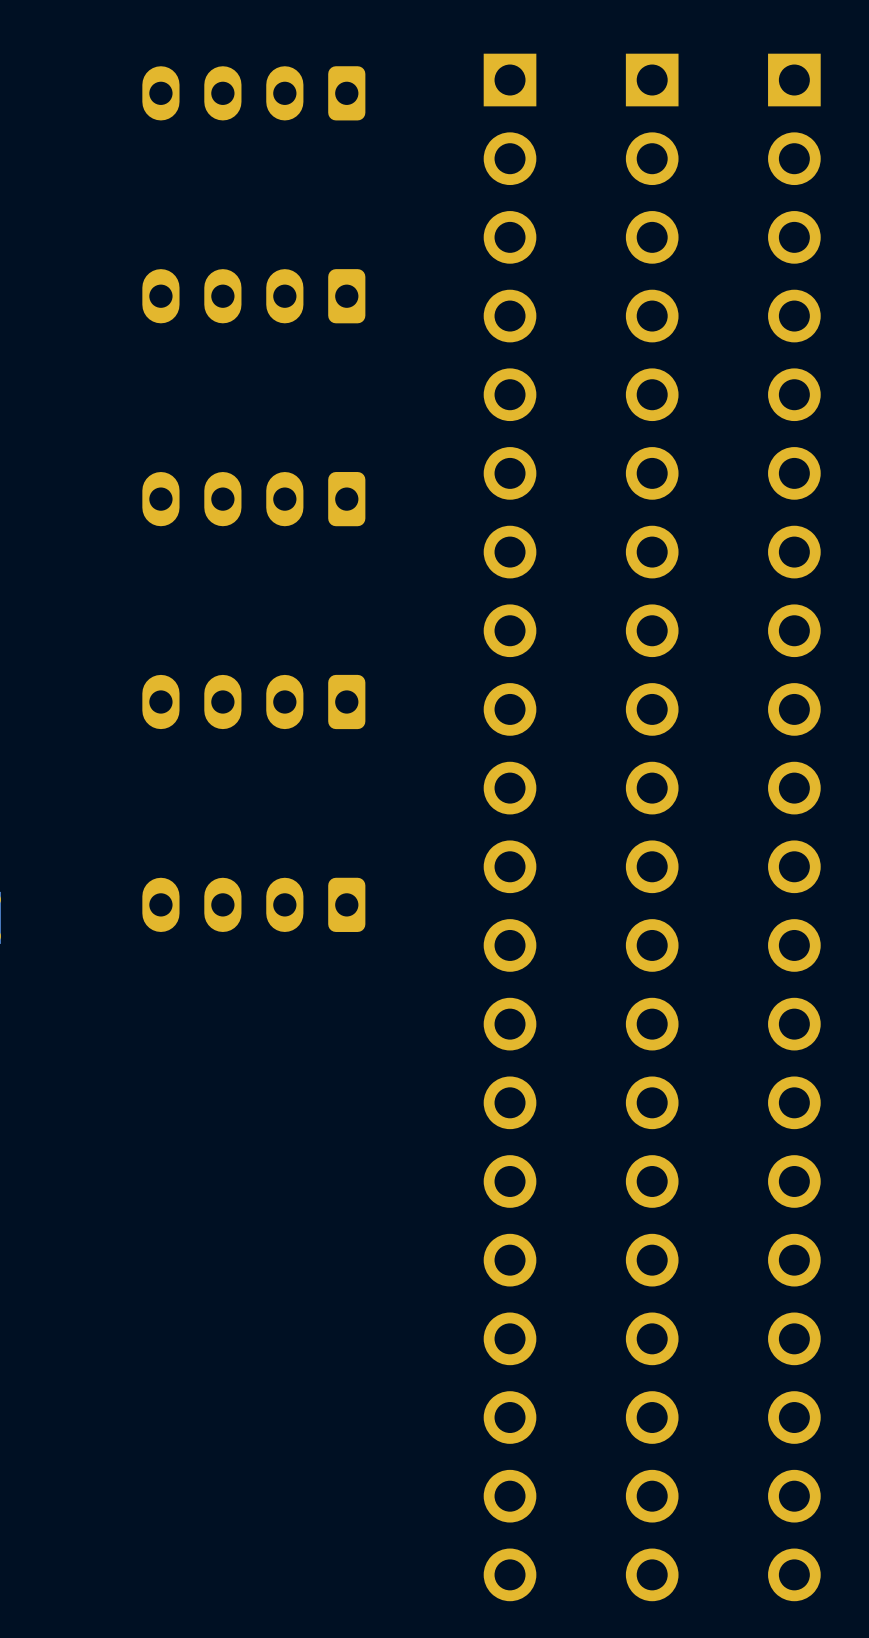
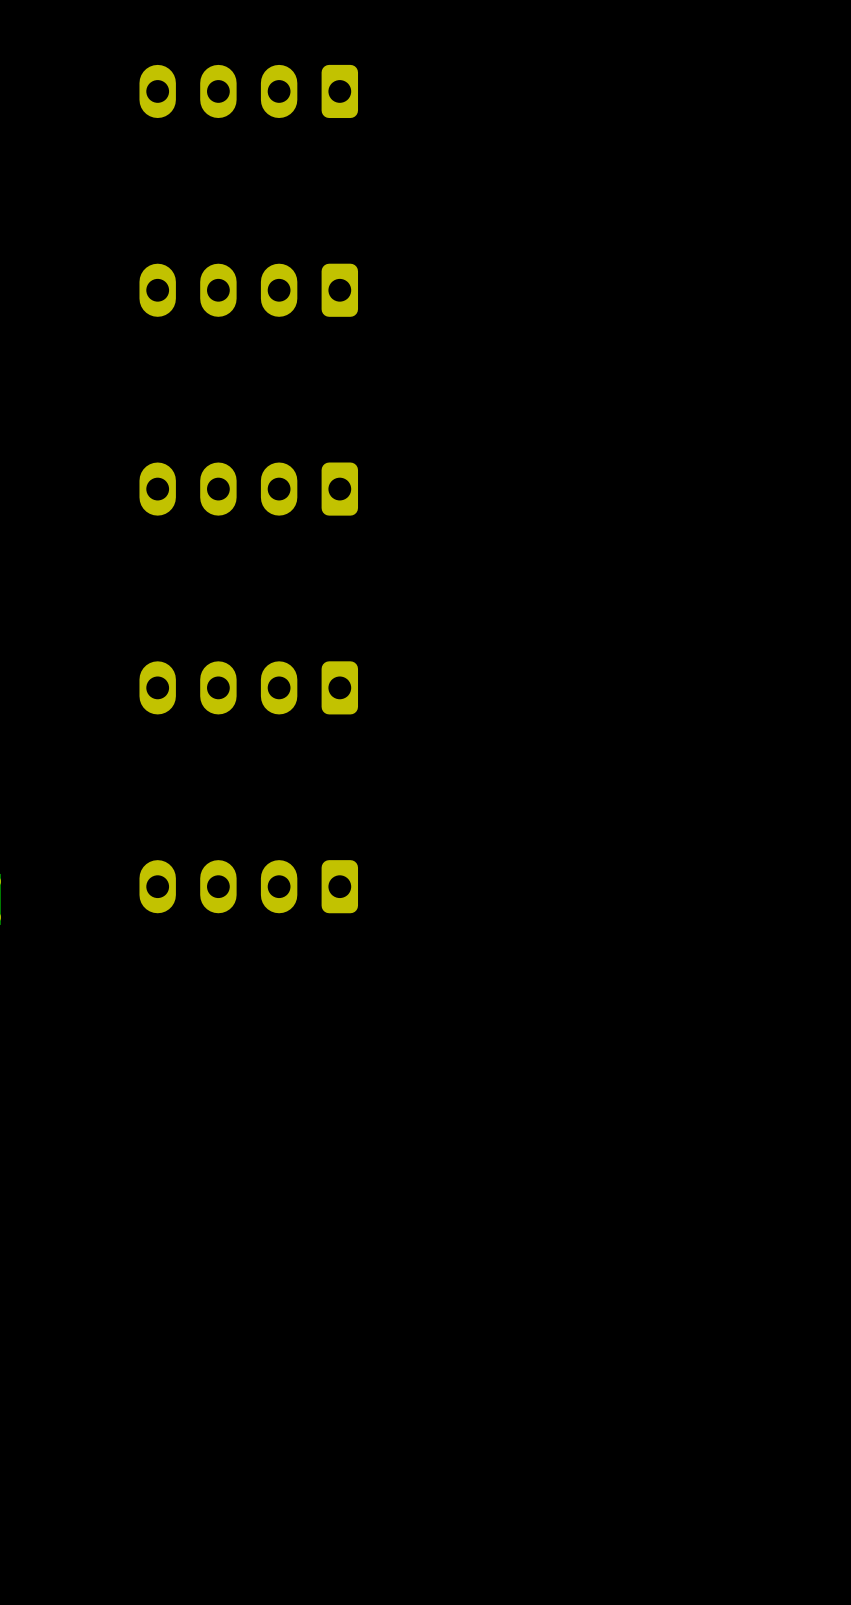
part: (510, 827) -> none
part: (652, 827) -> none
part: (794, 827) -> none

